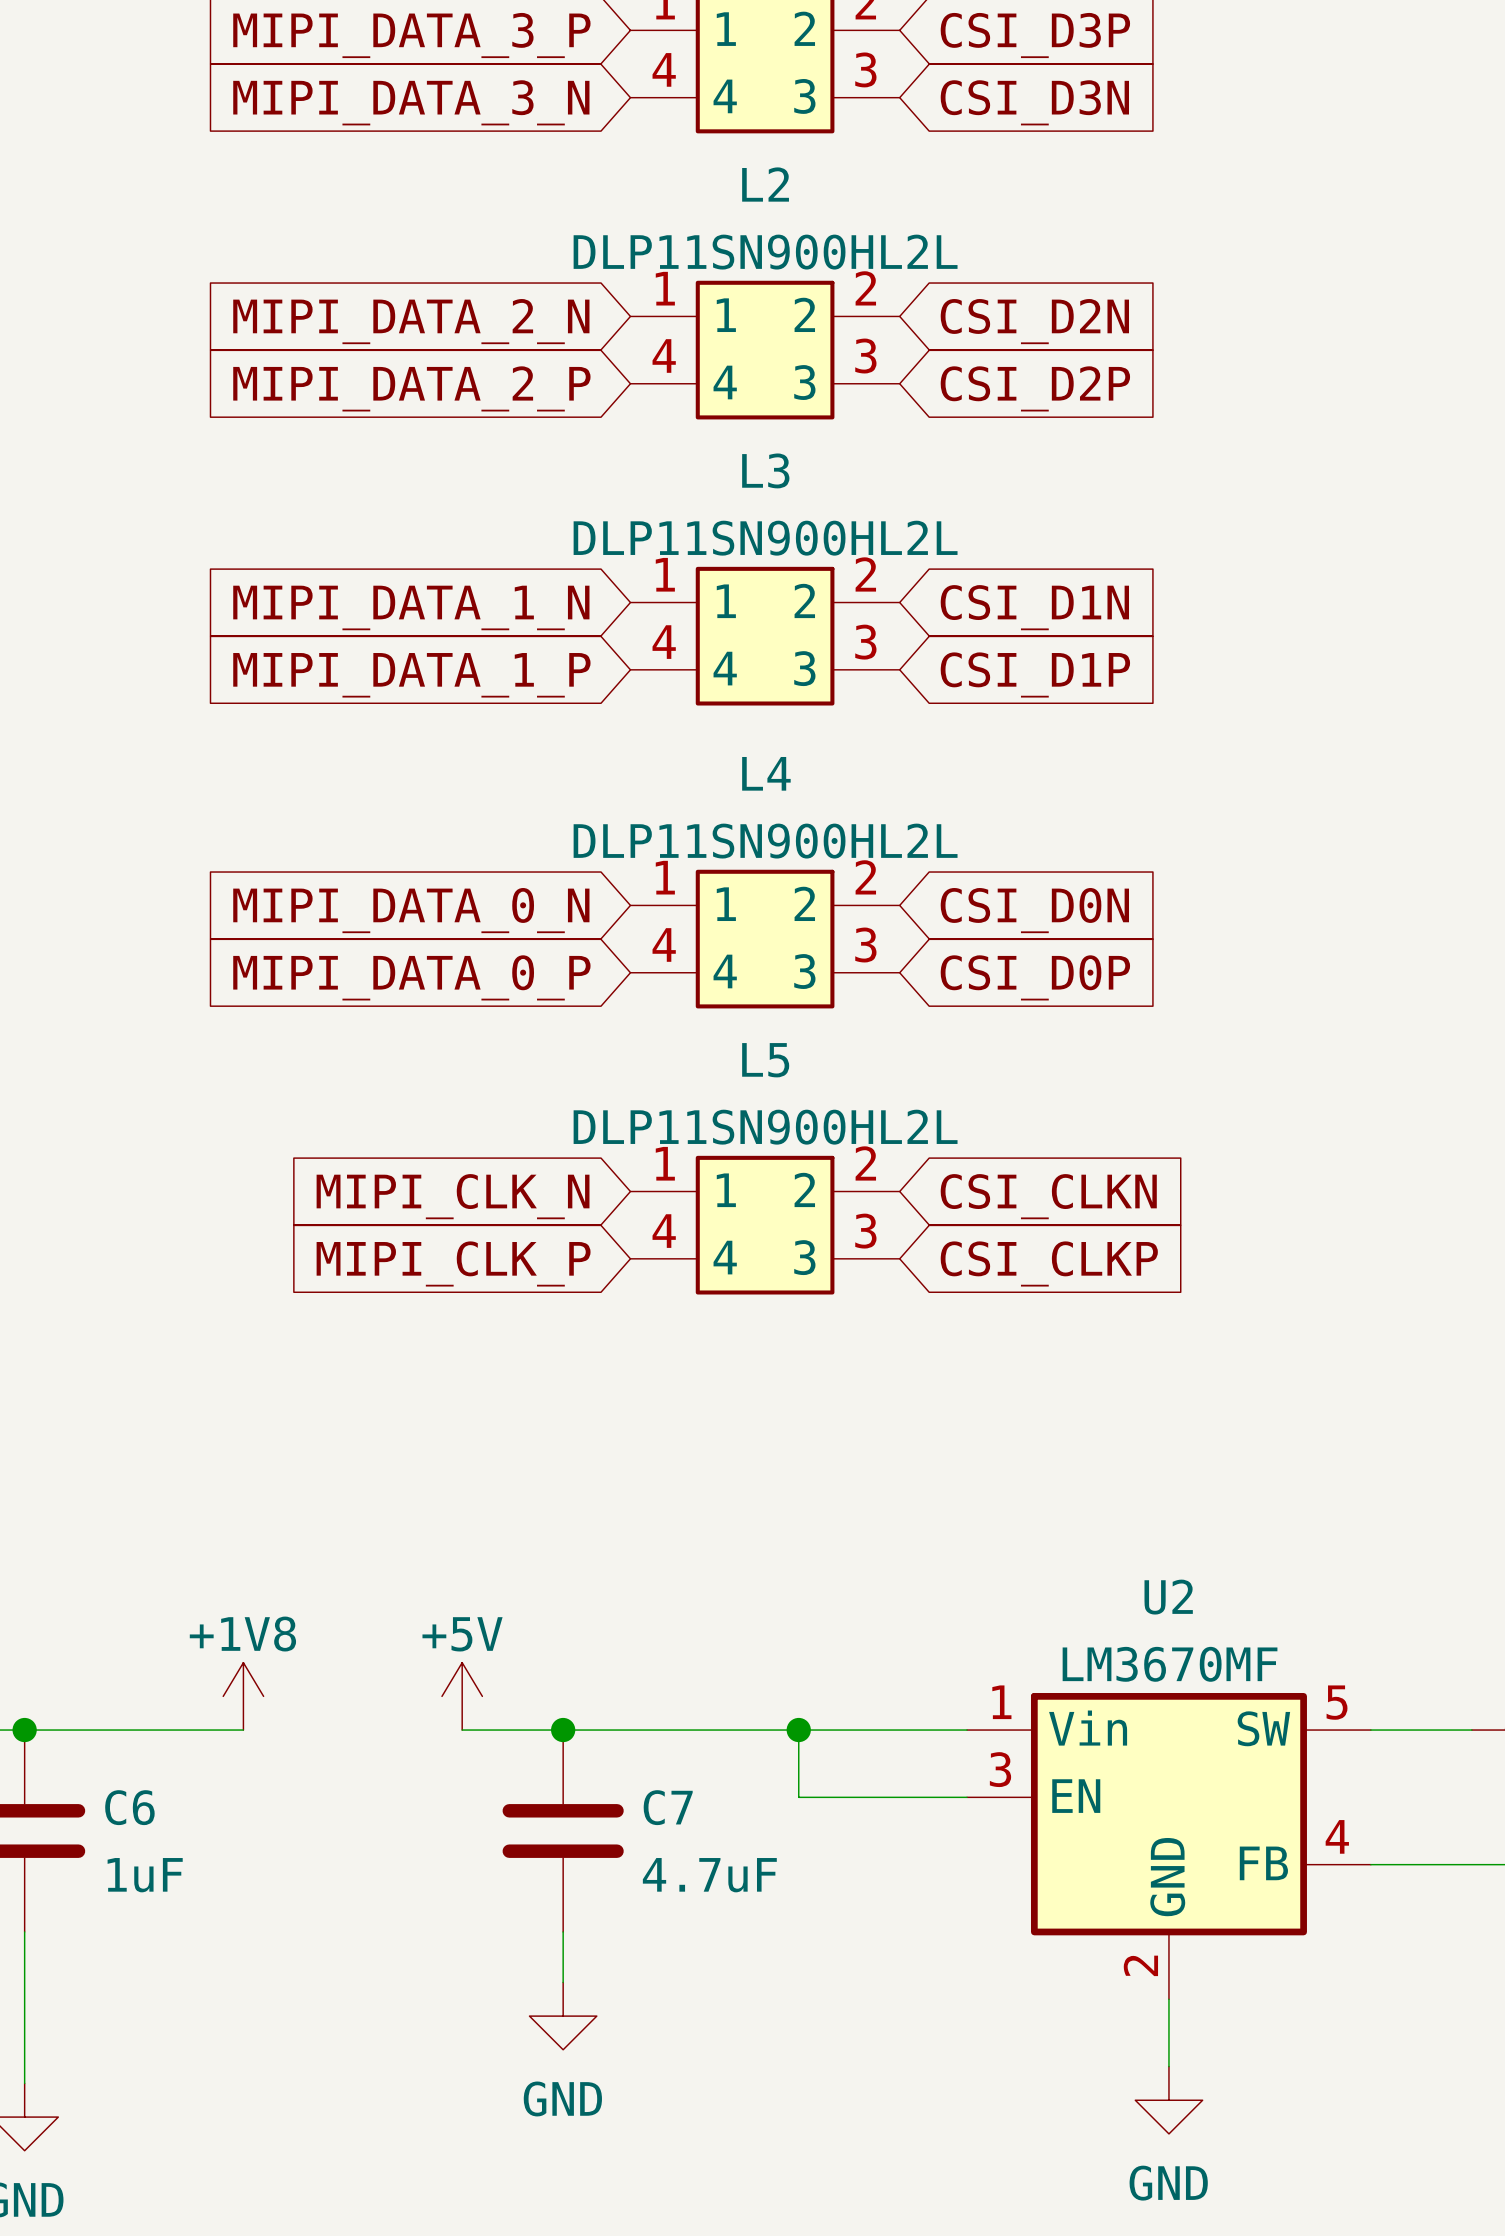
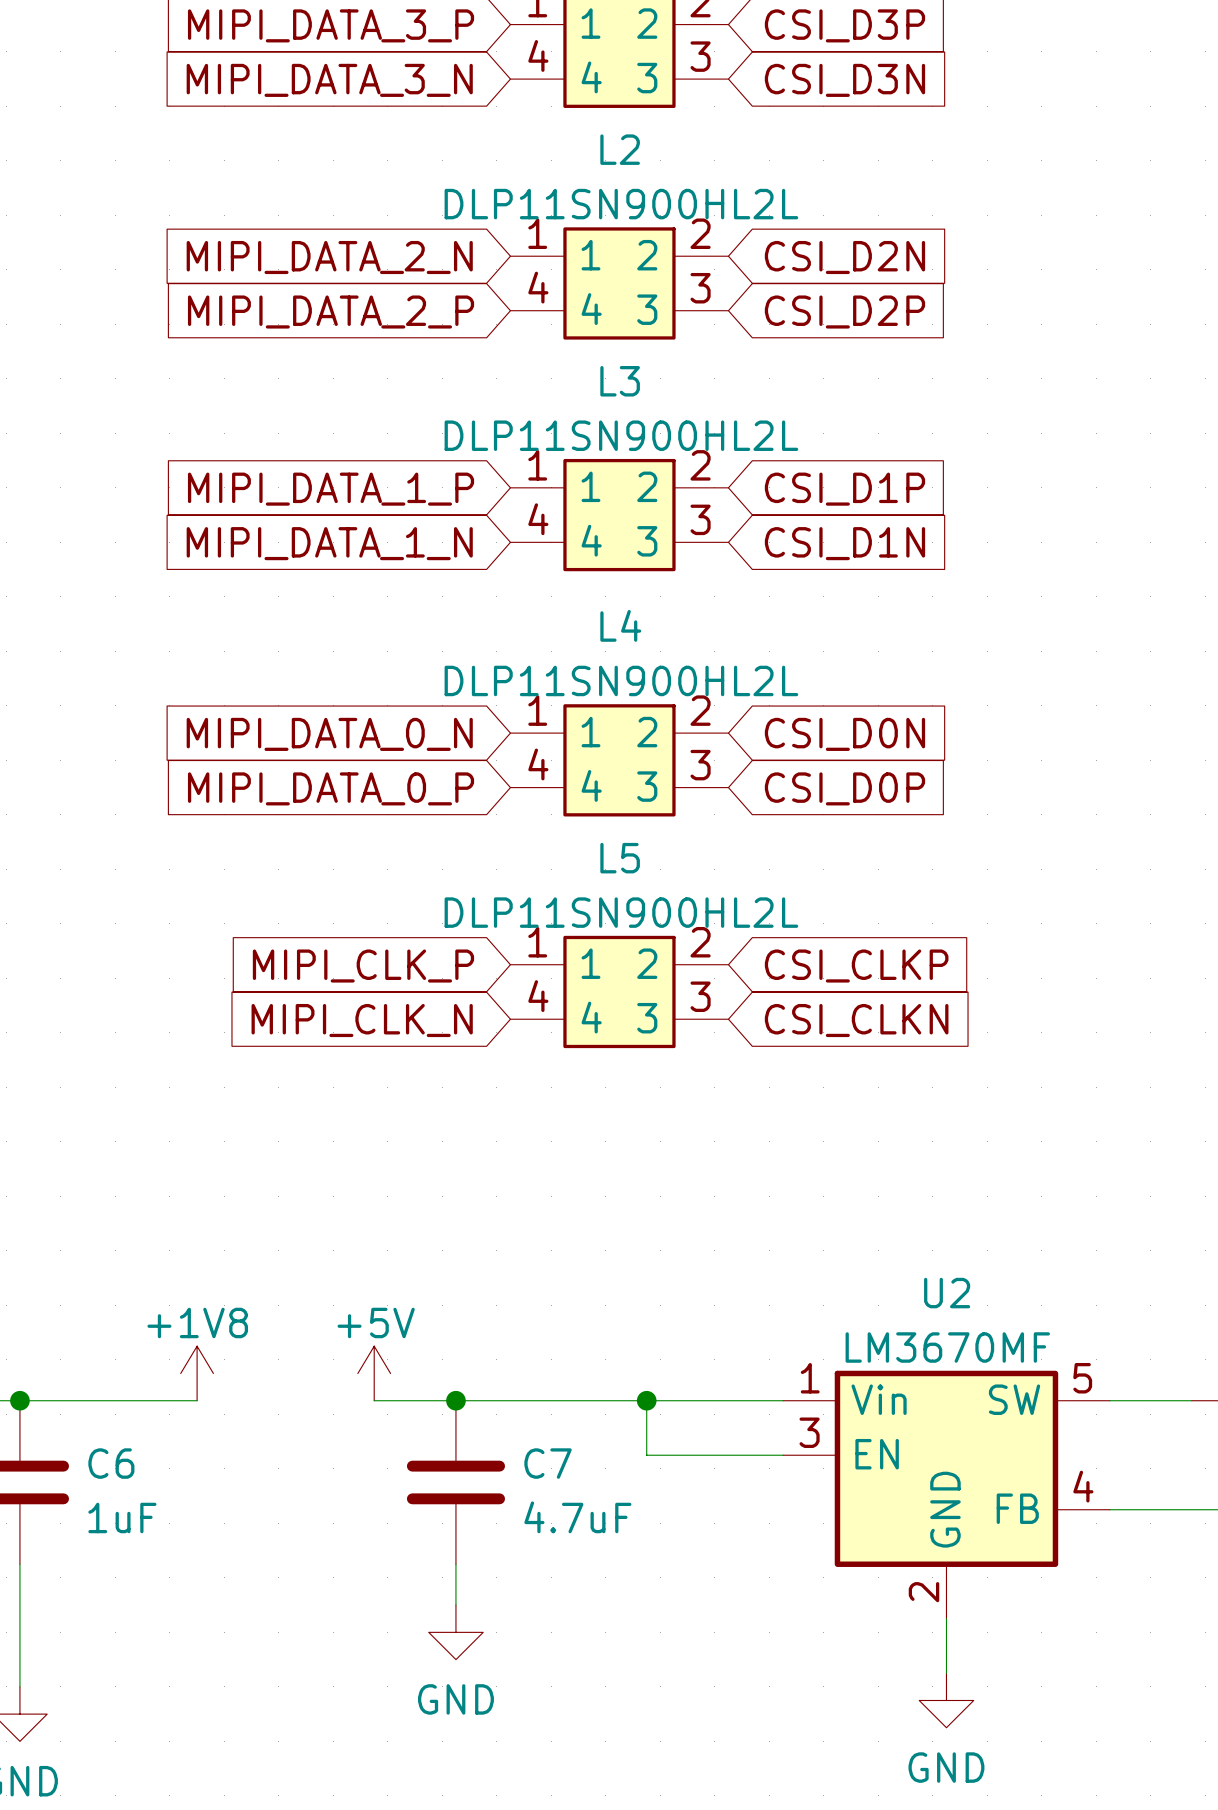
global label: MIPI_DATA_1_N (411, 607) -> MIPI_DATA_1_P (331, 489)
global label: CSI_D1N (1034, 607) -> CSI_D1P (844, 489)
global label: CSI_D1P (1035, 674) -> CSI_D1N (844, 543)
global label: MIPI_DATA_1_P (411, 675) -> MIPI_DATA_1_N (329, 543)
global label: MIPI_CLK_N (453, 1196) -> MIPI_CLK_P (363, 966)
global label: CSI_CLKN (1048, 1196) -> CSI_CLKP (856, 966)
global label: MIPI_CLK_P (453, 1263) -> MIPI_CLK_N (362, 1020)
global label: CSI_CLKP (1049, 1263) -> CSI_CLKN (856, 1020)

